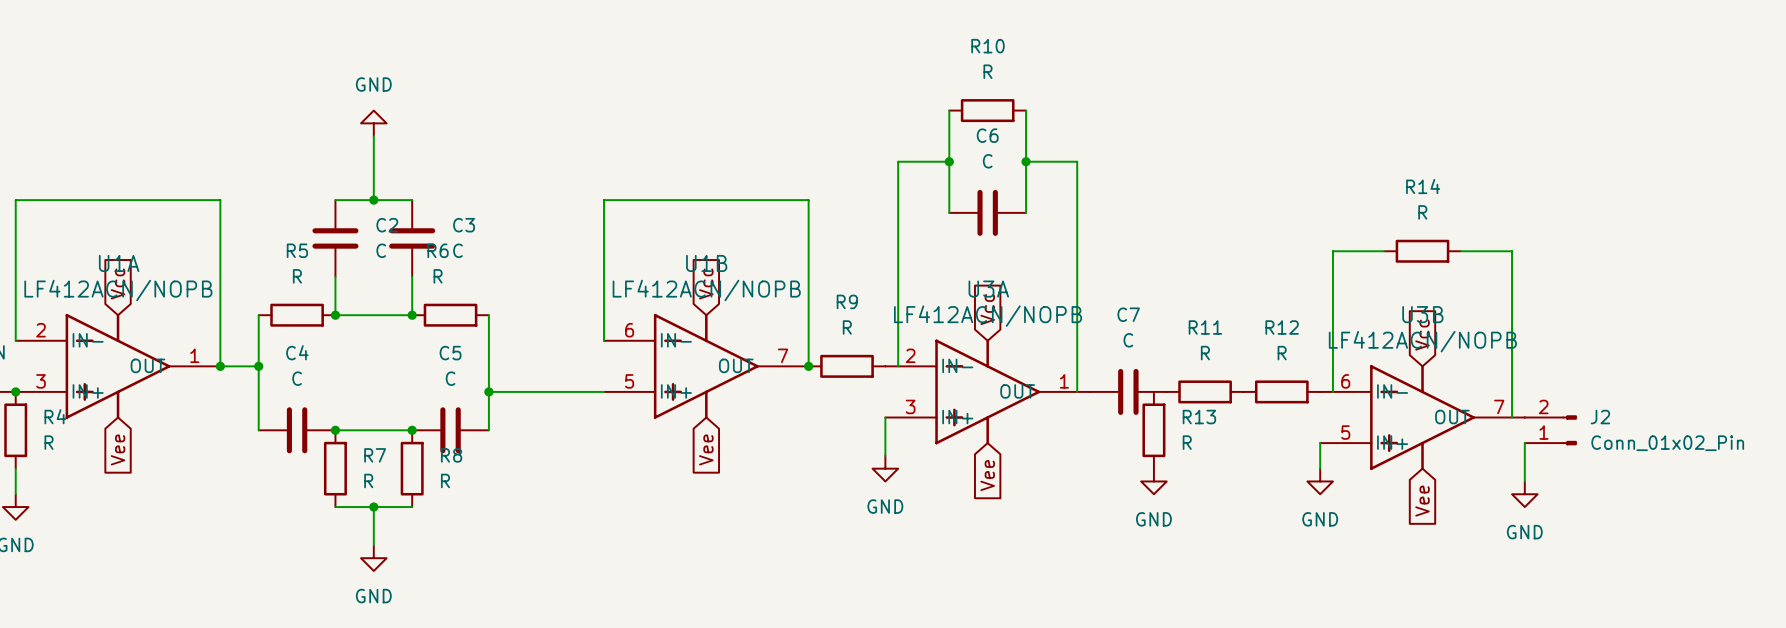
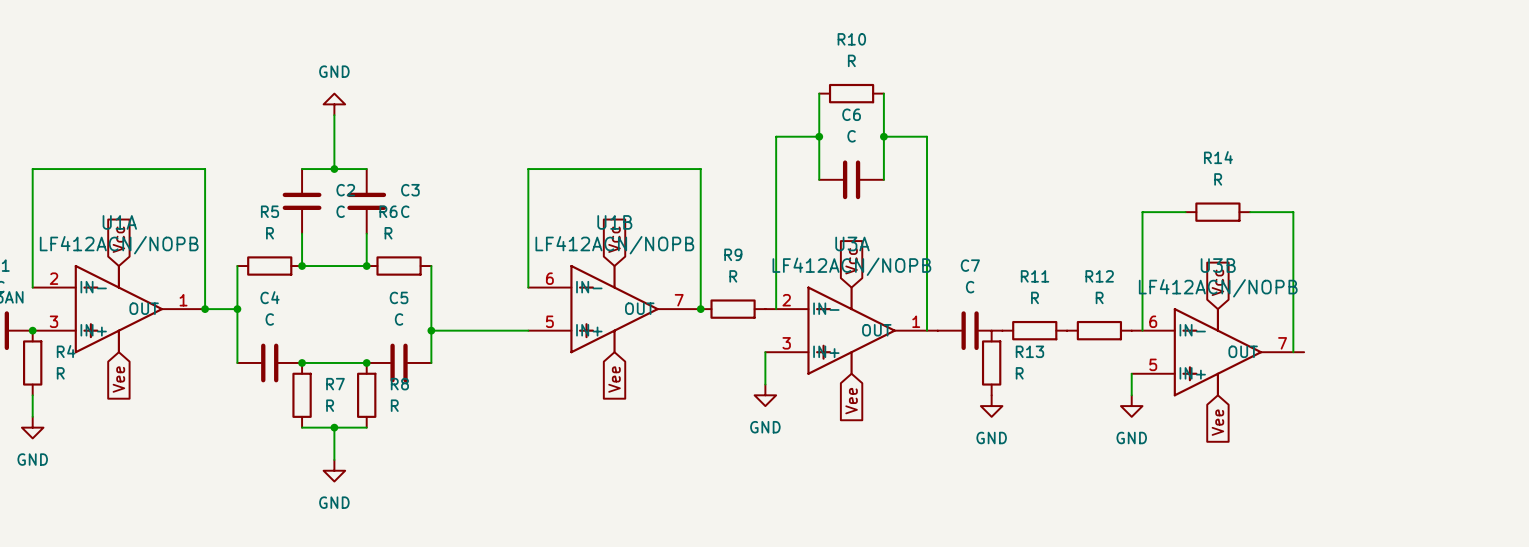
J2: Conn_01x02_Pin (1550, 430) -> none
wire: (1524, 443) (1524, 481) -> none
power symbol: GND (1524, 494) -> none

